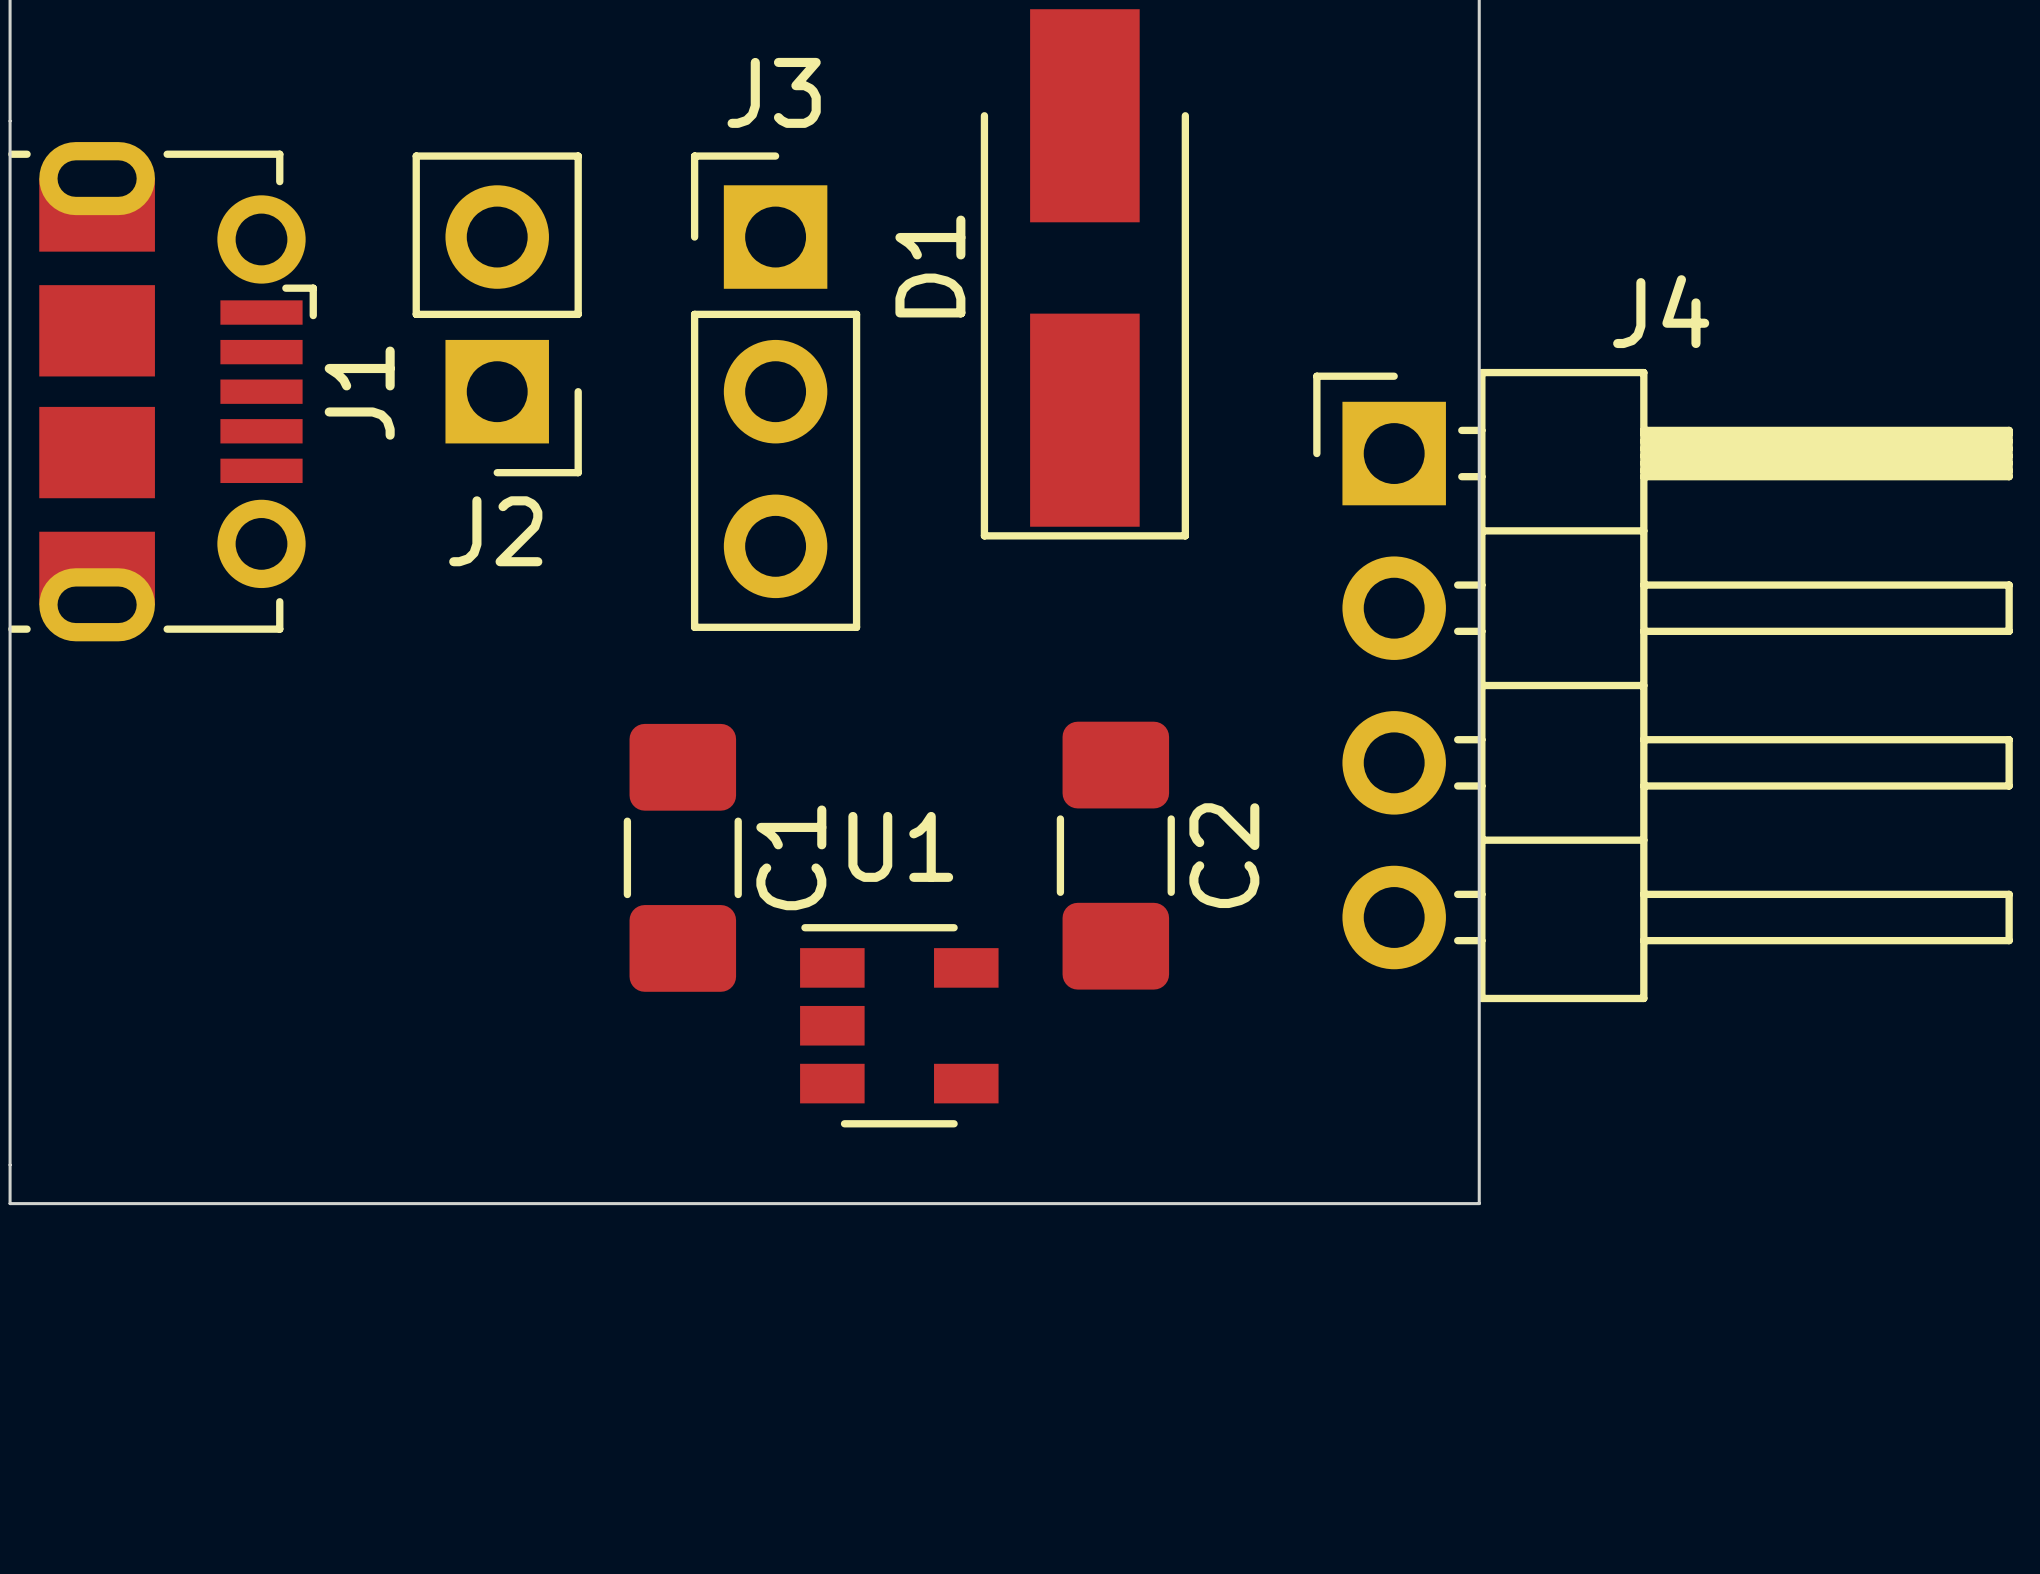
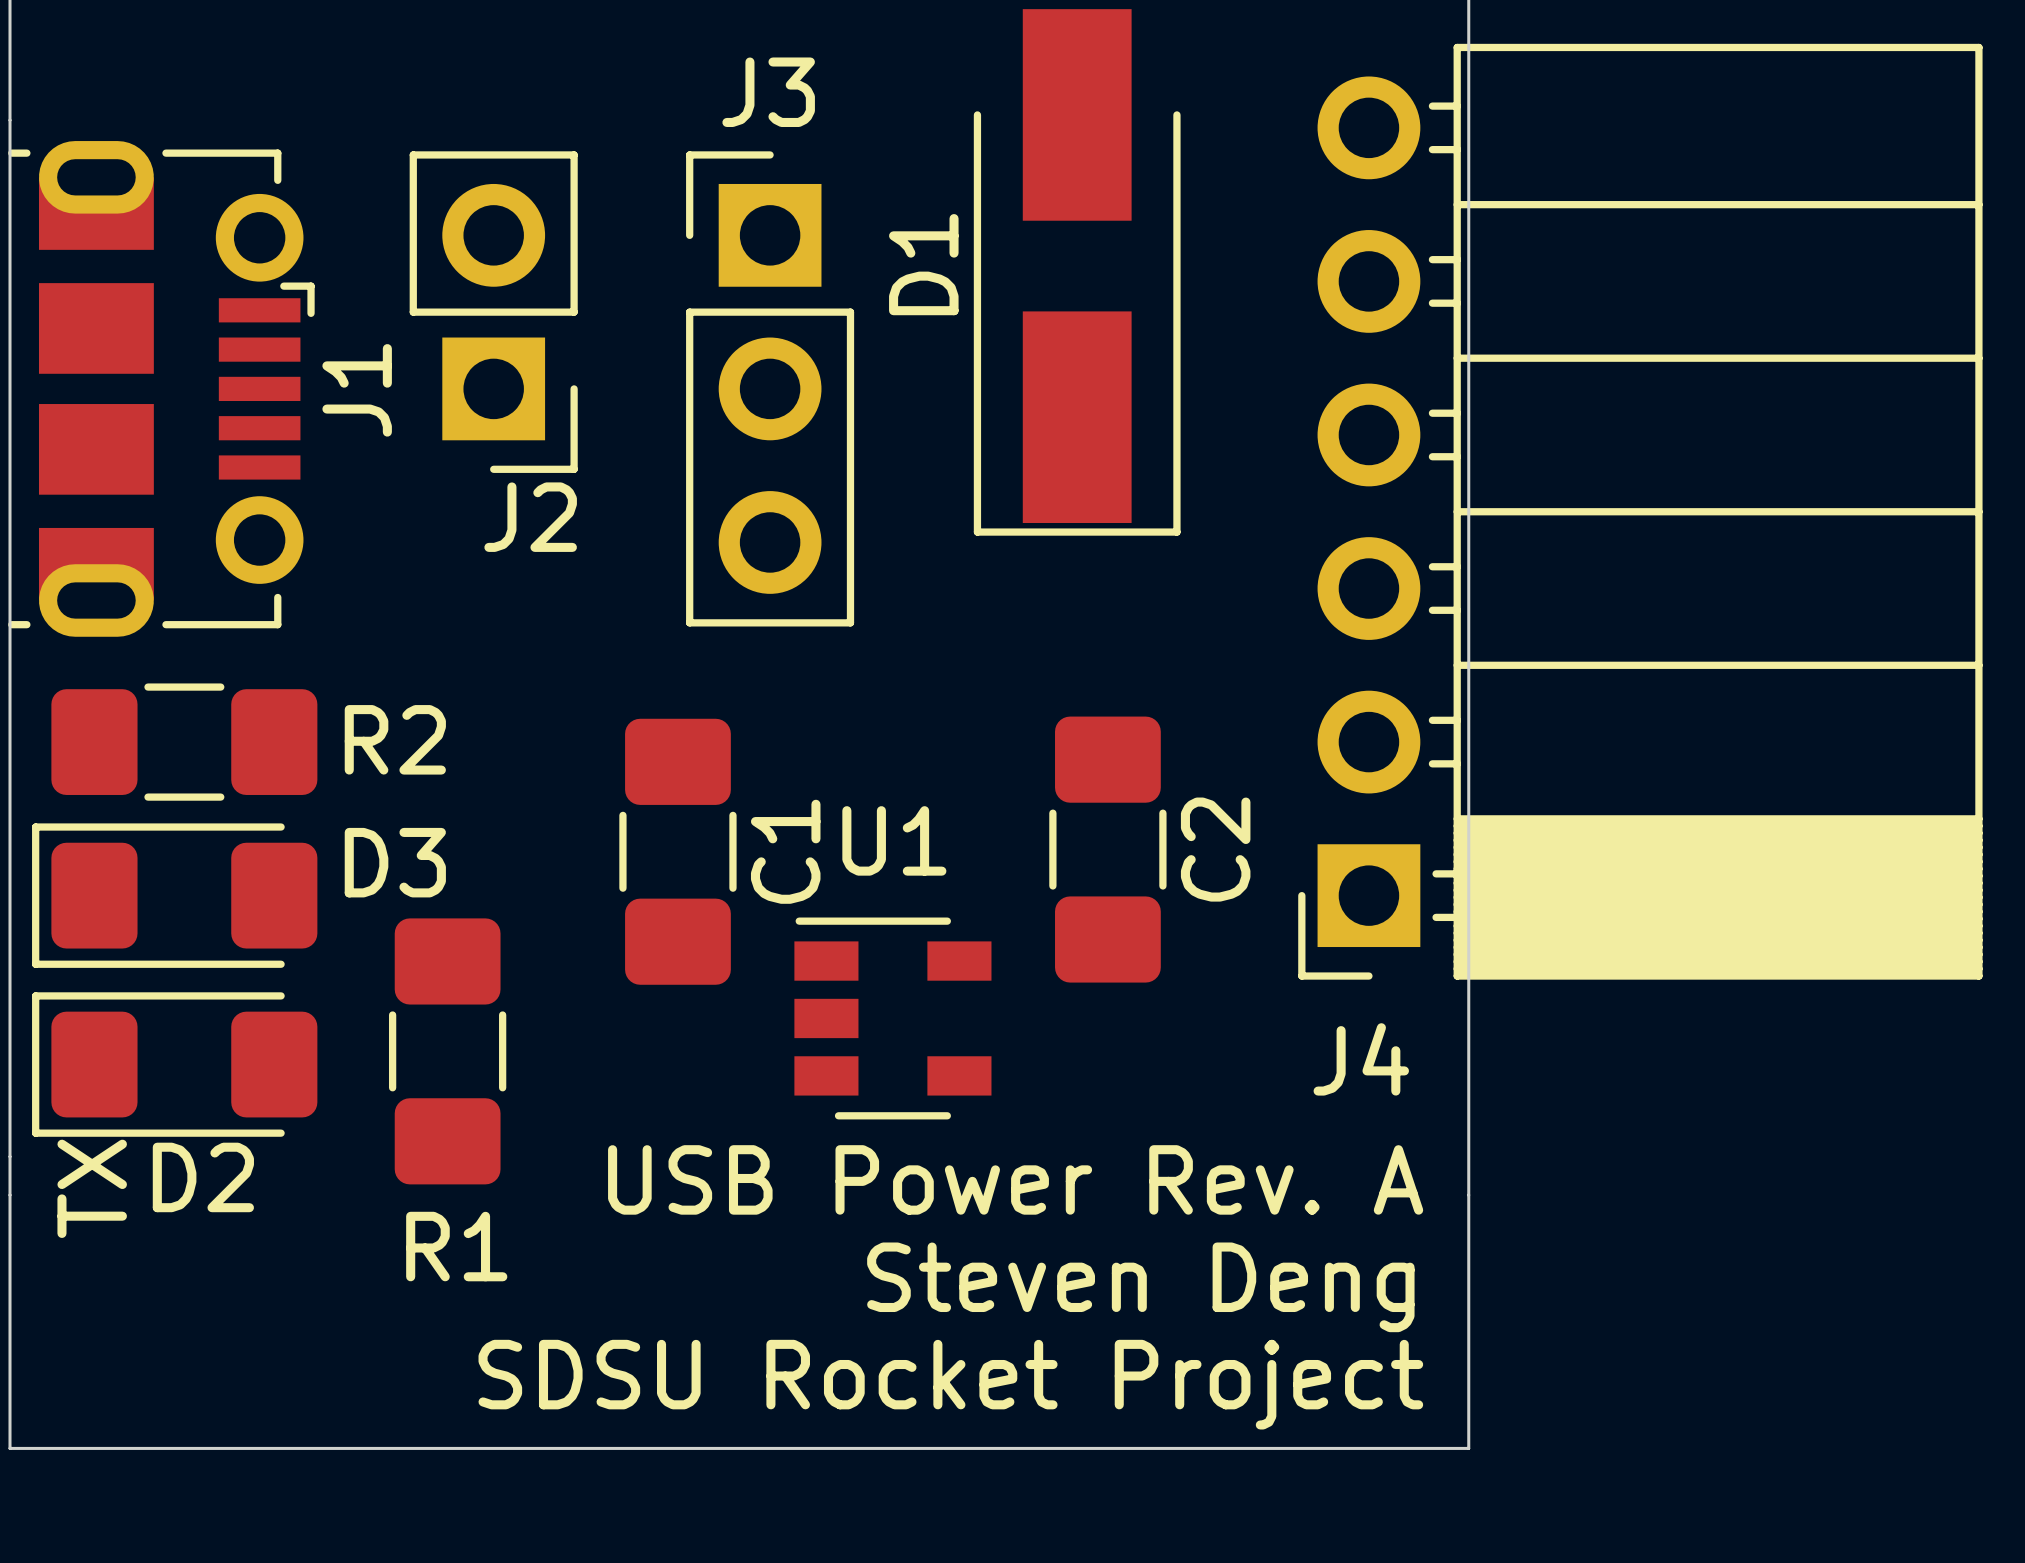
J4 name position: J4 (1661, 311) -> J4 (1361, 1059)
J4 footprint: [1313, 368, 2013, 1003] -> [1298, 43, 1983, 980]
J2 name position: J2 (495, 531) -> J2 (530, 517)
R2: none -> (184, 742)
D3: none -> (174, 895)
R1: none -> (447, 1051)
D2: none -> (174, 1064)
text: none -> USB Power Rev. A (1015, 1179)
text: none -> TX (92, 1188)
board edge: (10, 1203) (1479, 1203) -> (10, 1195) (10, 1448) (1468, 1448) (1468, 1195)
text: none -> Steven Deng (1140, 1287)
text: none -> SDSU Rocket Project (950, 1384)

